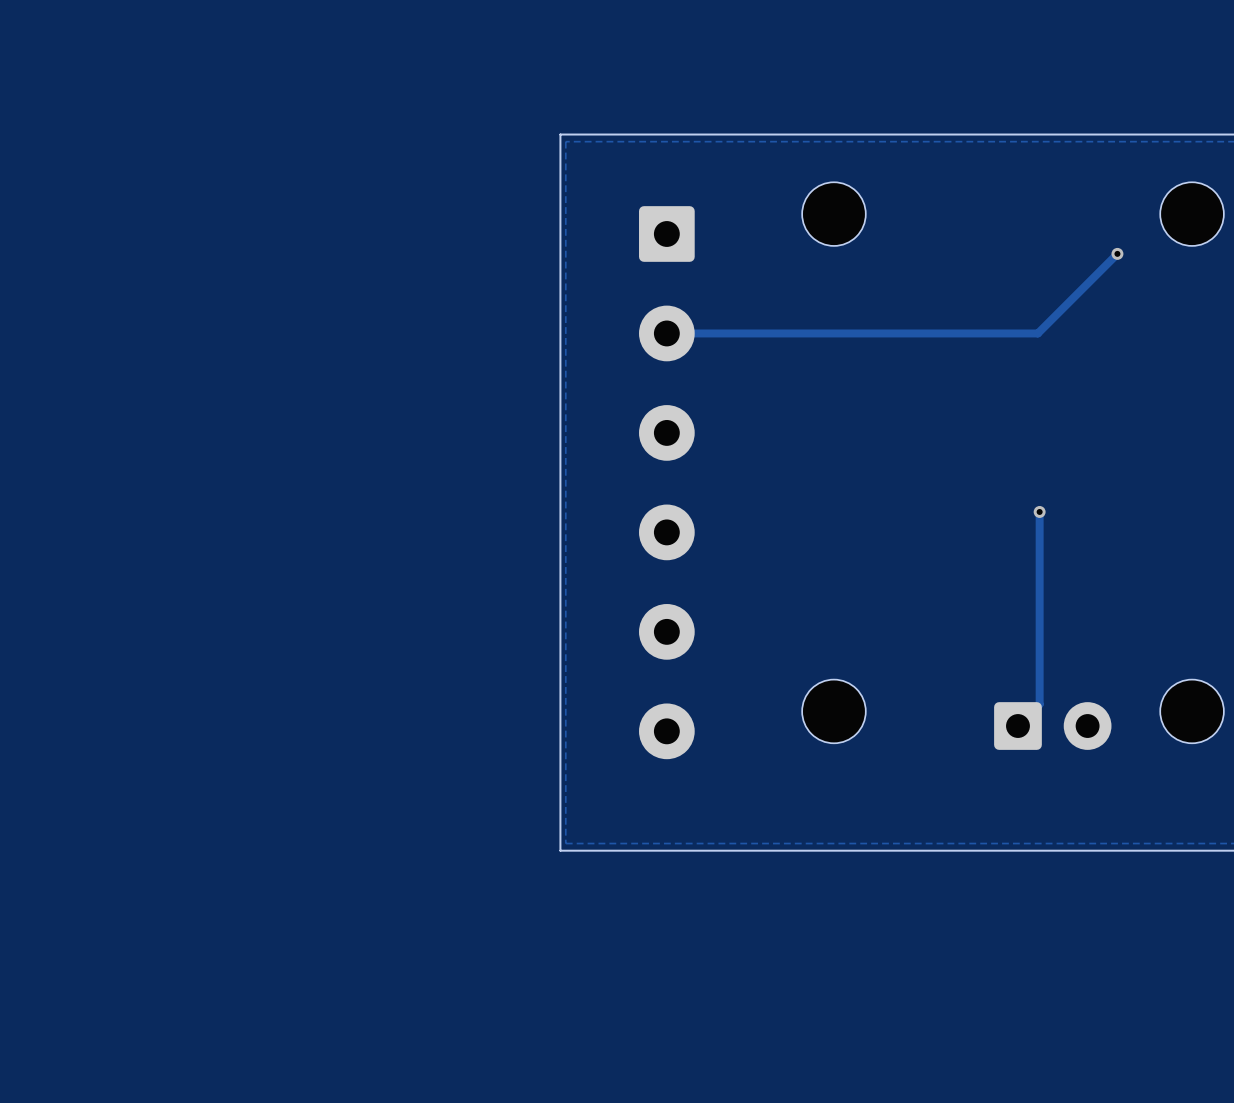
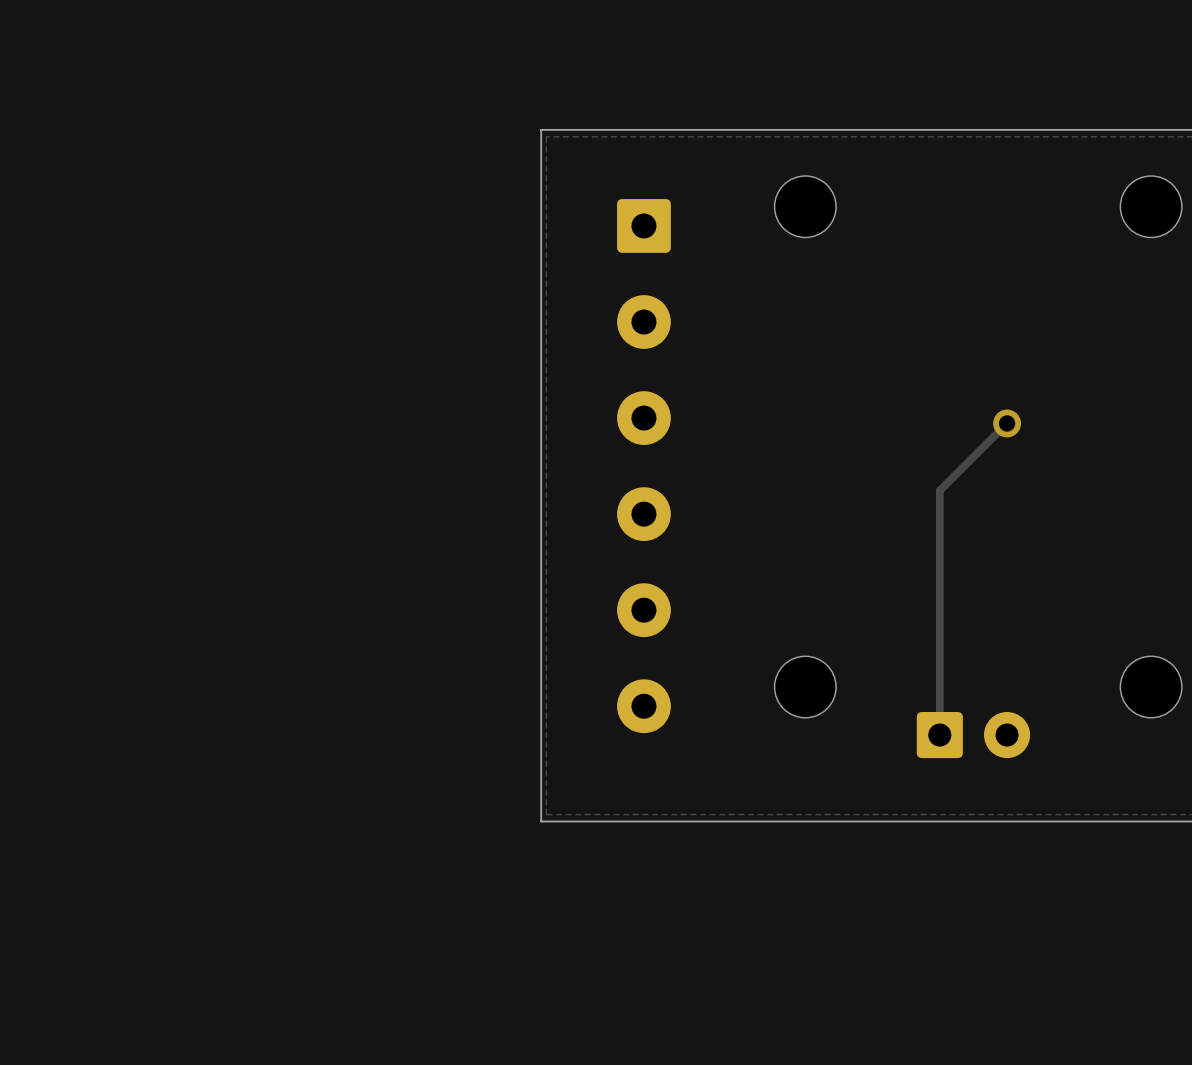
track: (1117, 253) (1037, 333) (666, 333) -> none
via: (1117, 253) -> none
track: none -> (1007, 423) (939, 490) (939, 735)
via: none -> (1007, 423)
track: (1039, 511) (1039, 704) (1017, 726) -> none
via: (1039, 511) -> none
part position: (1052, 726) -> (973, 735)

